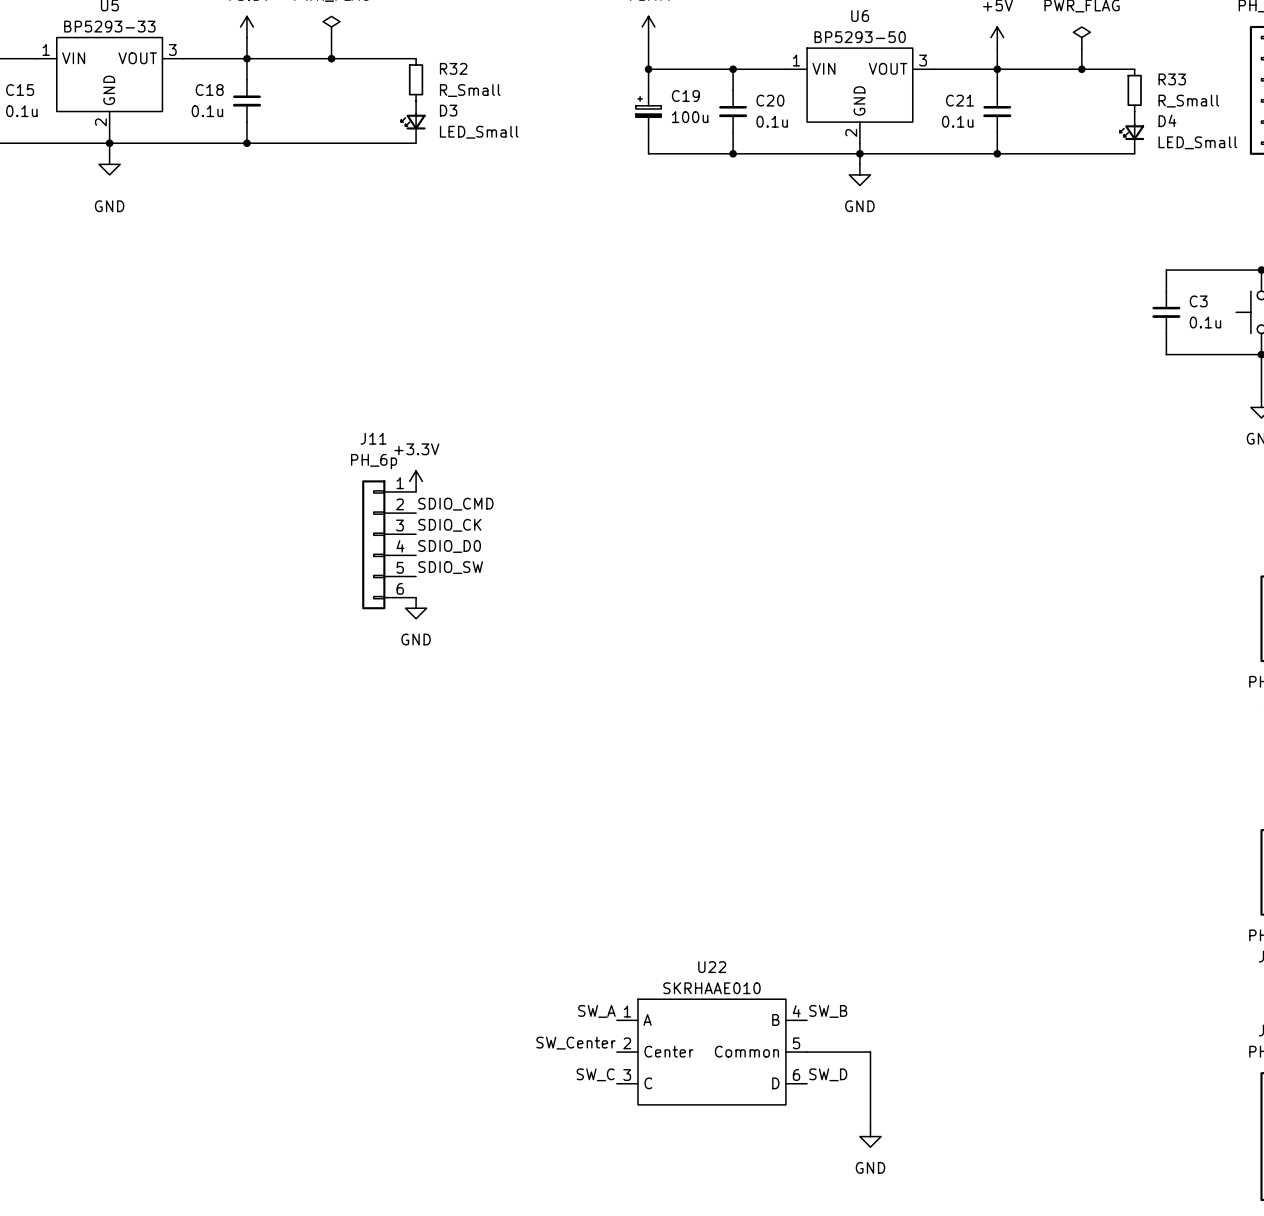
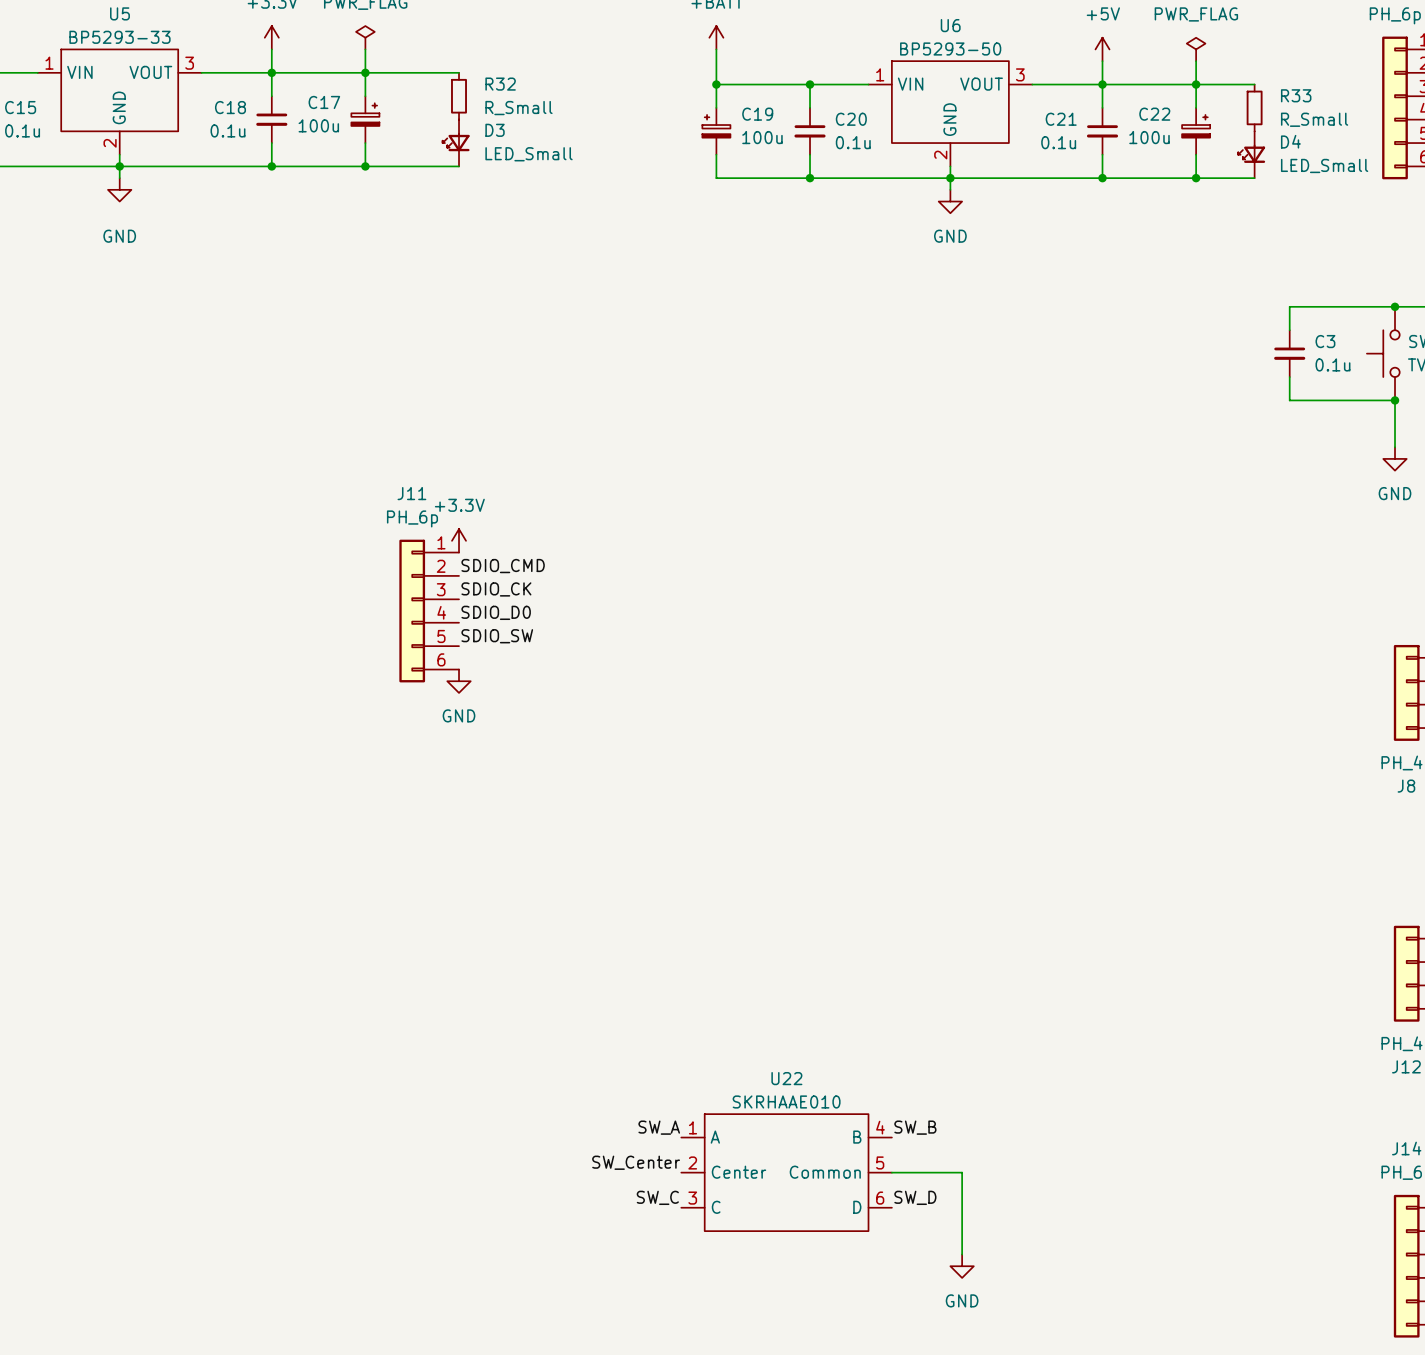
wire: none -> (365, 72) (365, 96)
wire: none -> (1196, 84) (1196, 107)
C17: none -> 100u (365, 119)
C22: none -> 100u (1196, 131)
wire: none -> (365, 143) (365, 166)
wire: none -> (1196, 154) (1196, 178)
junction: none -> (365, 166)
junction: none -> (1196, 178)

